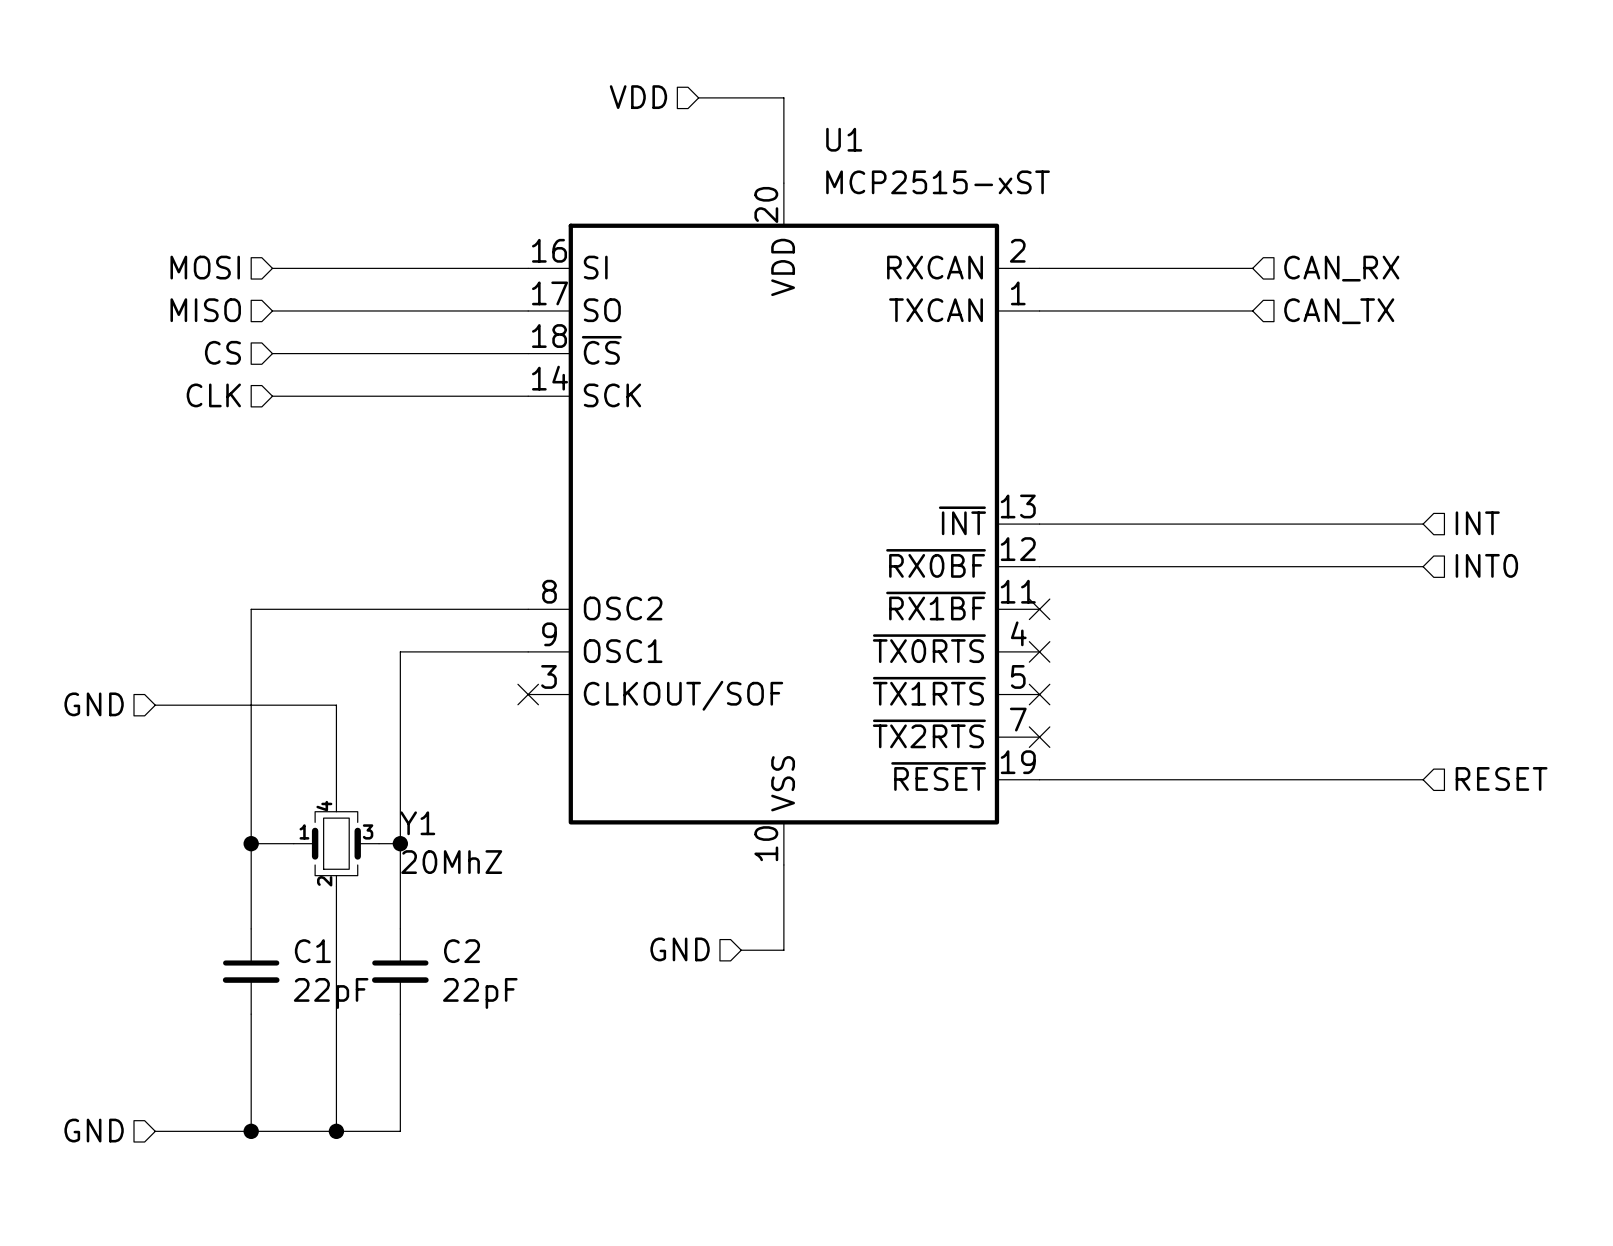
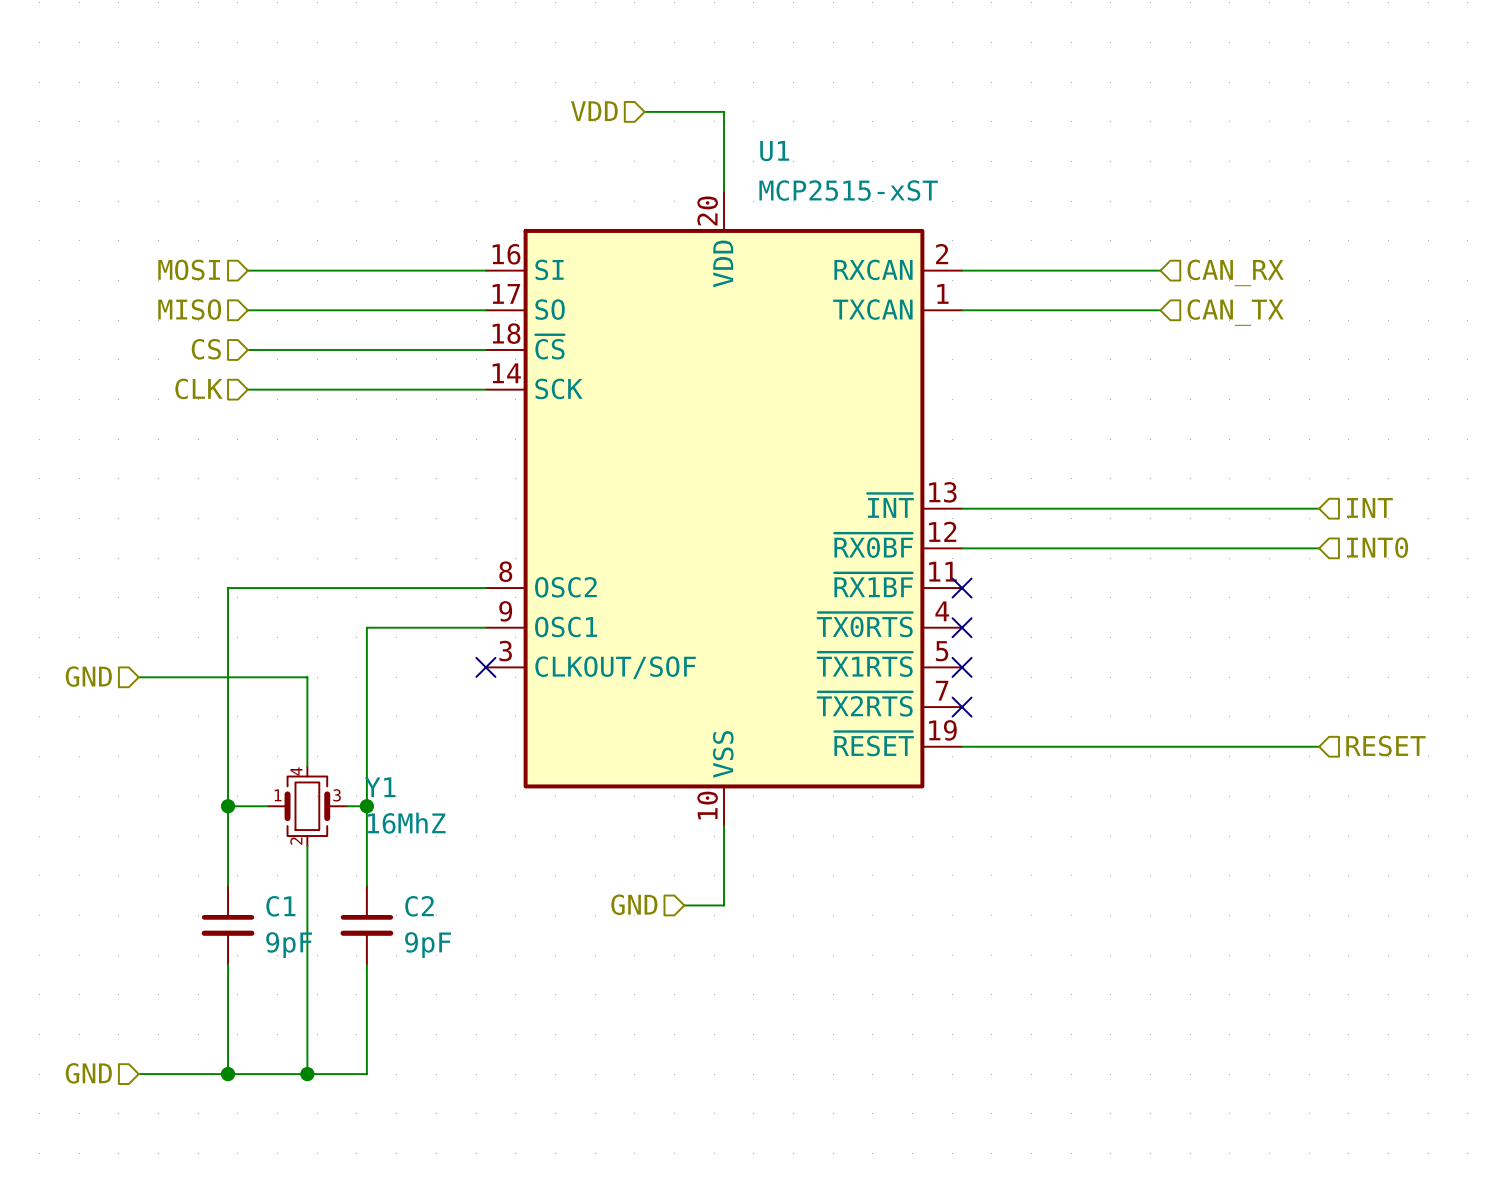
Y1 value: 20MhZ (451, 862) -> 16MhZ (406, 823)
C1 value: 22pF (331, 993) -> 9pF (289, 945)
C2 value: 22pF (480, 993) -> 9pF (428, 945)

